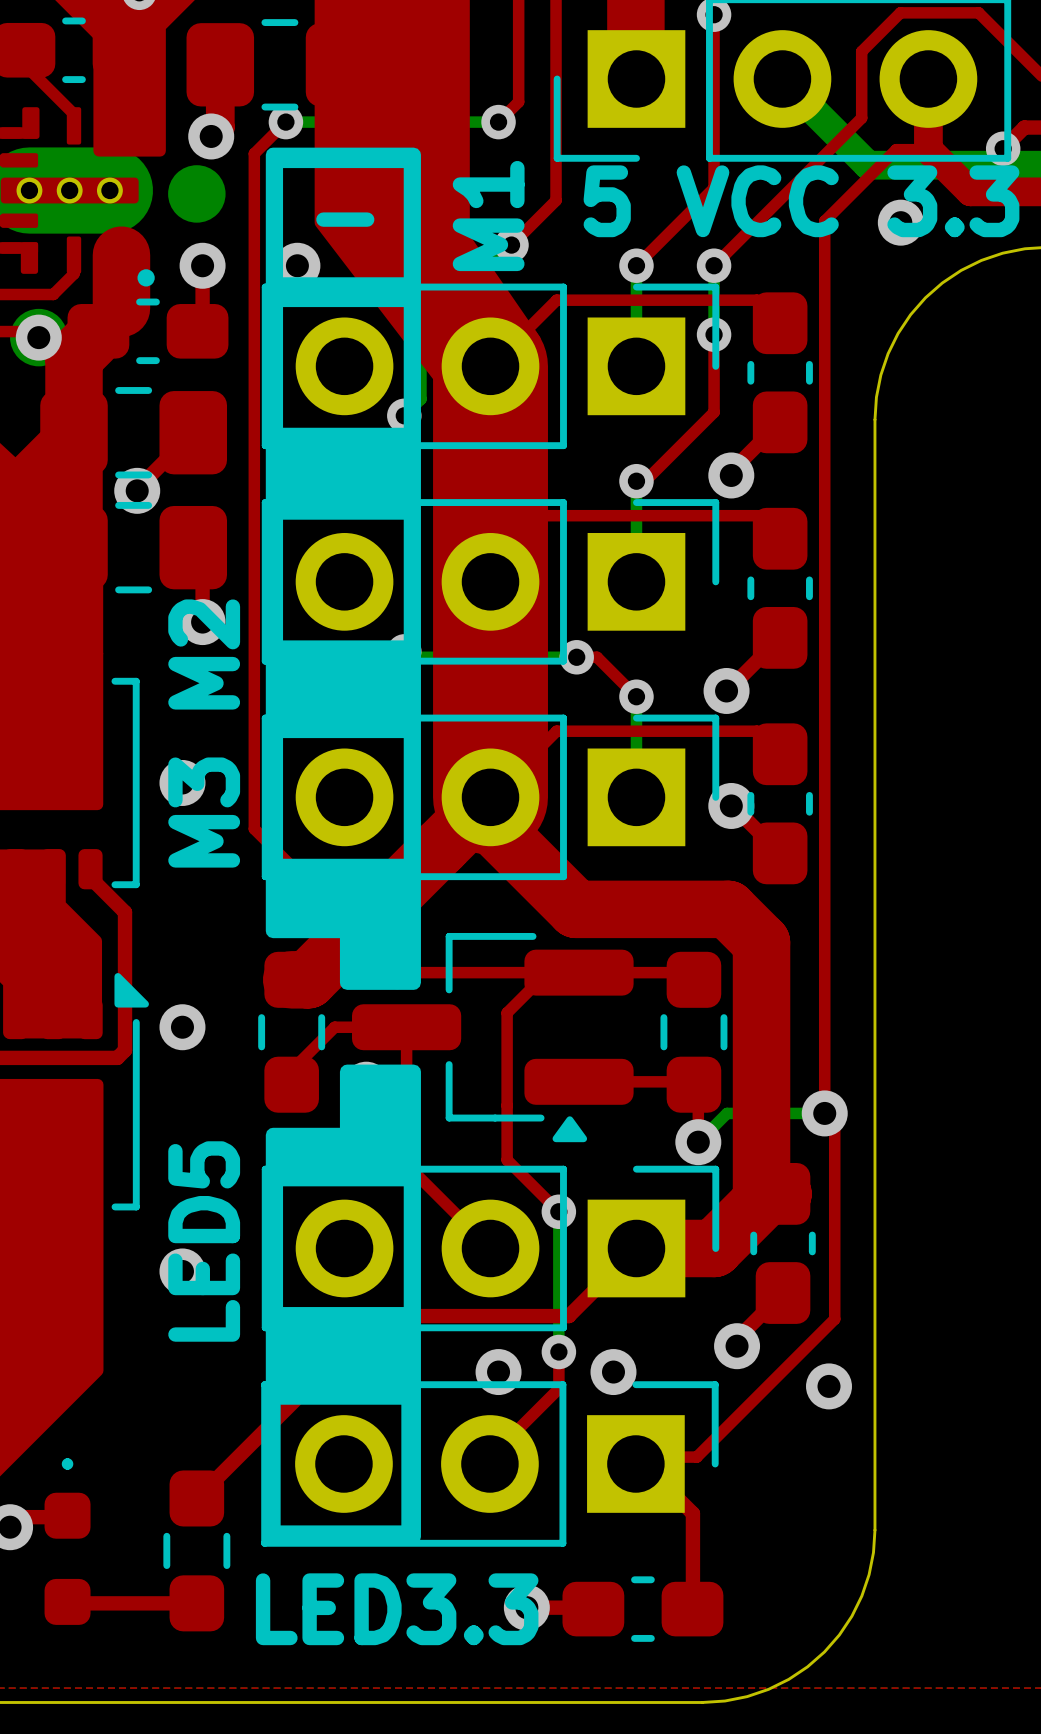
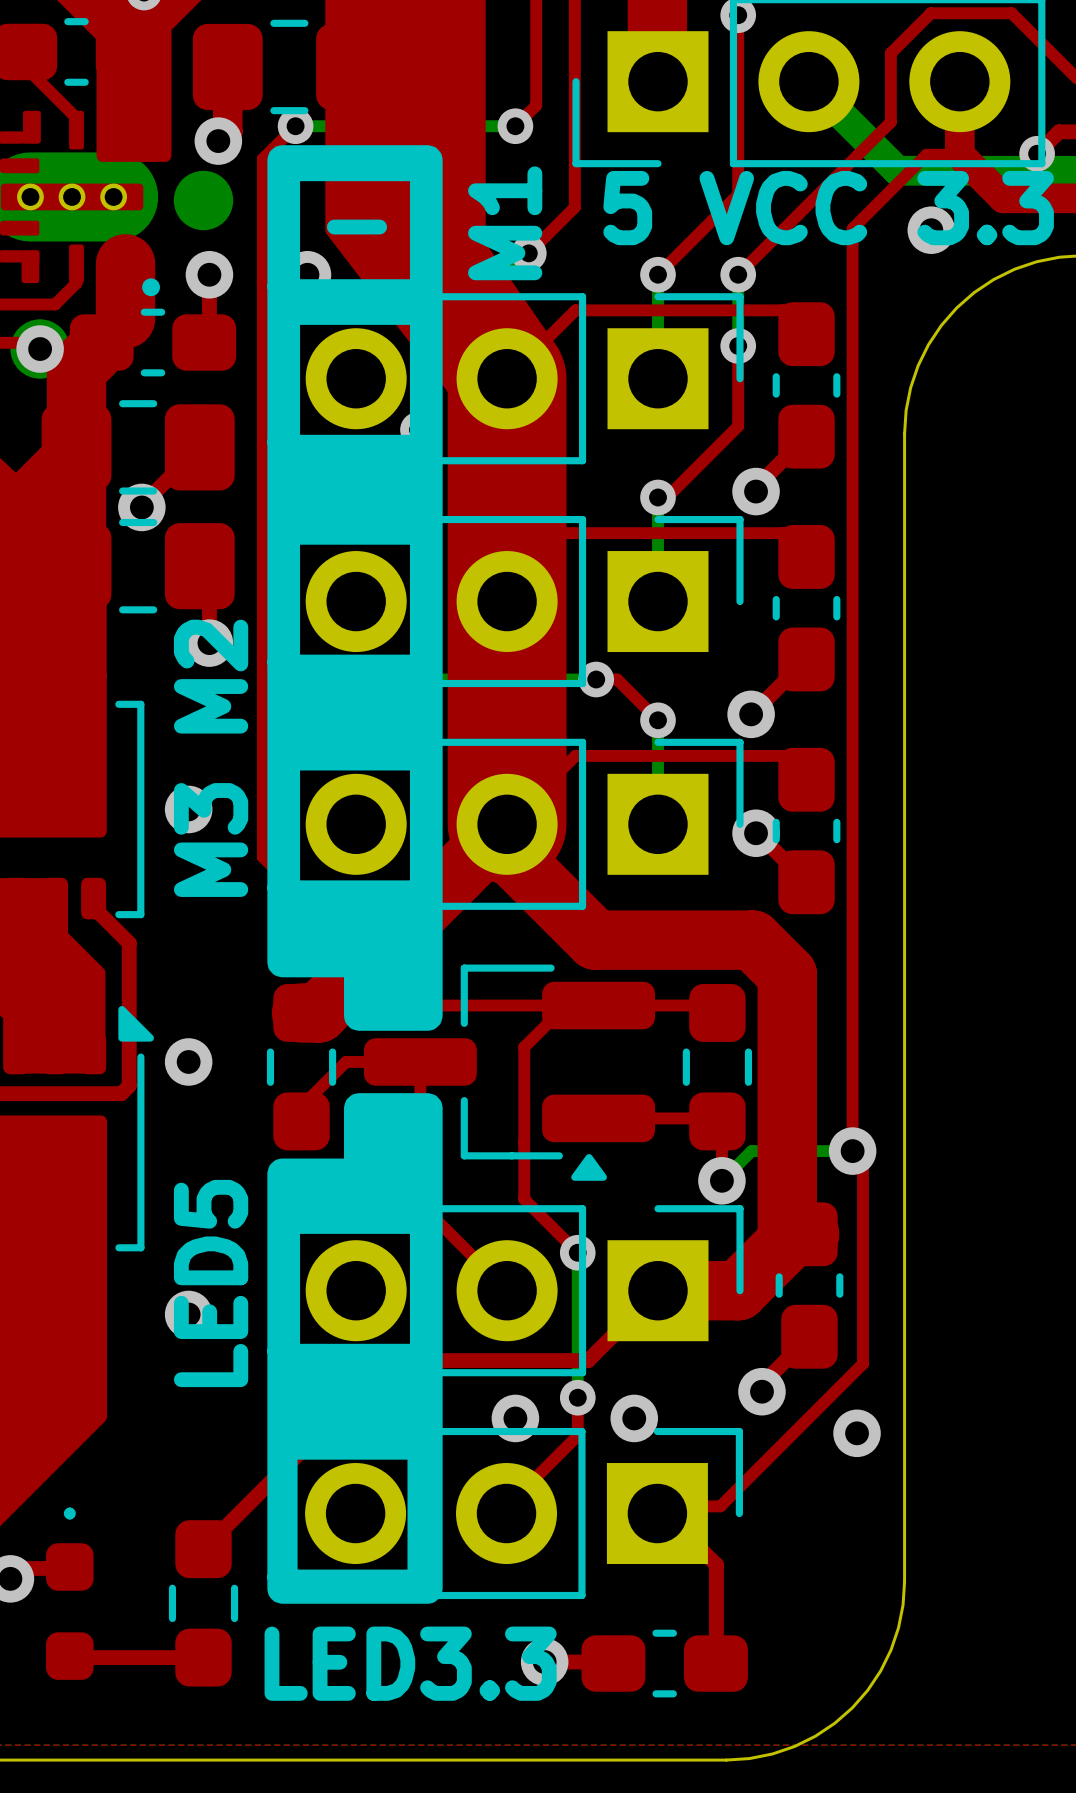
drawing shape: [265, 147, 421, 990] -> [267, 145, 443, 1031]
drawing shape: [265, 1064, 421, 1545] -> [267, 1093, 443, 1604]

